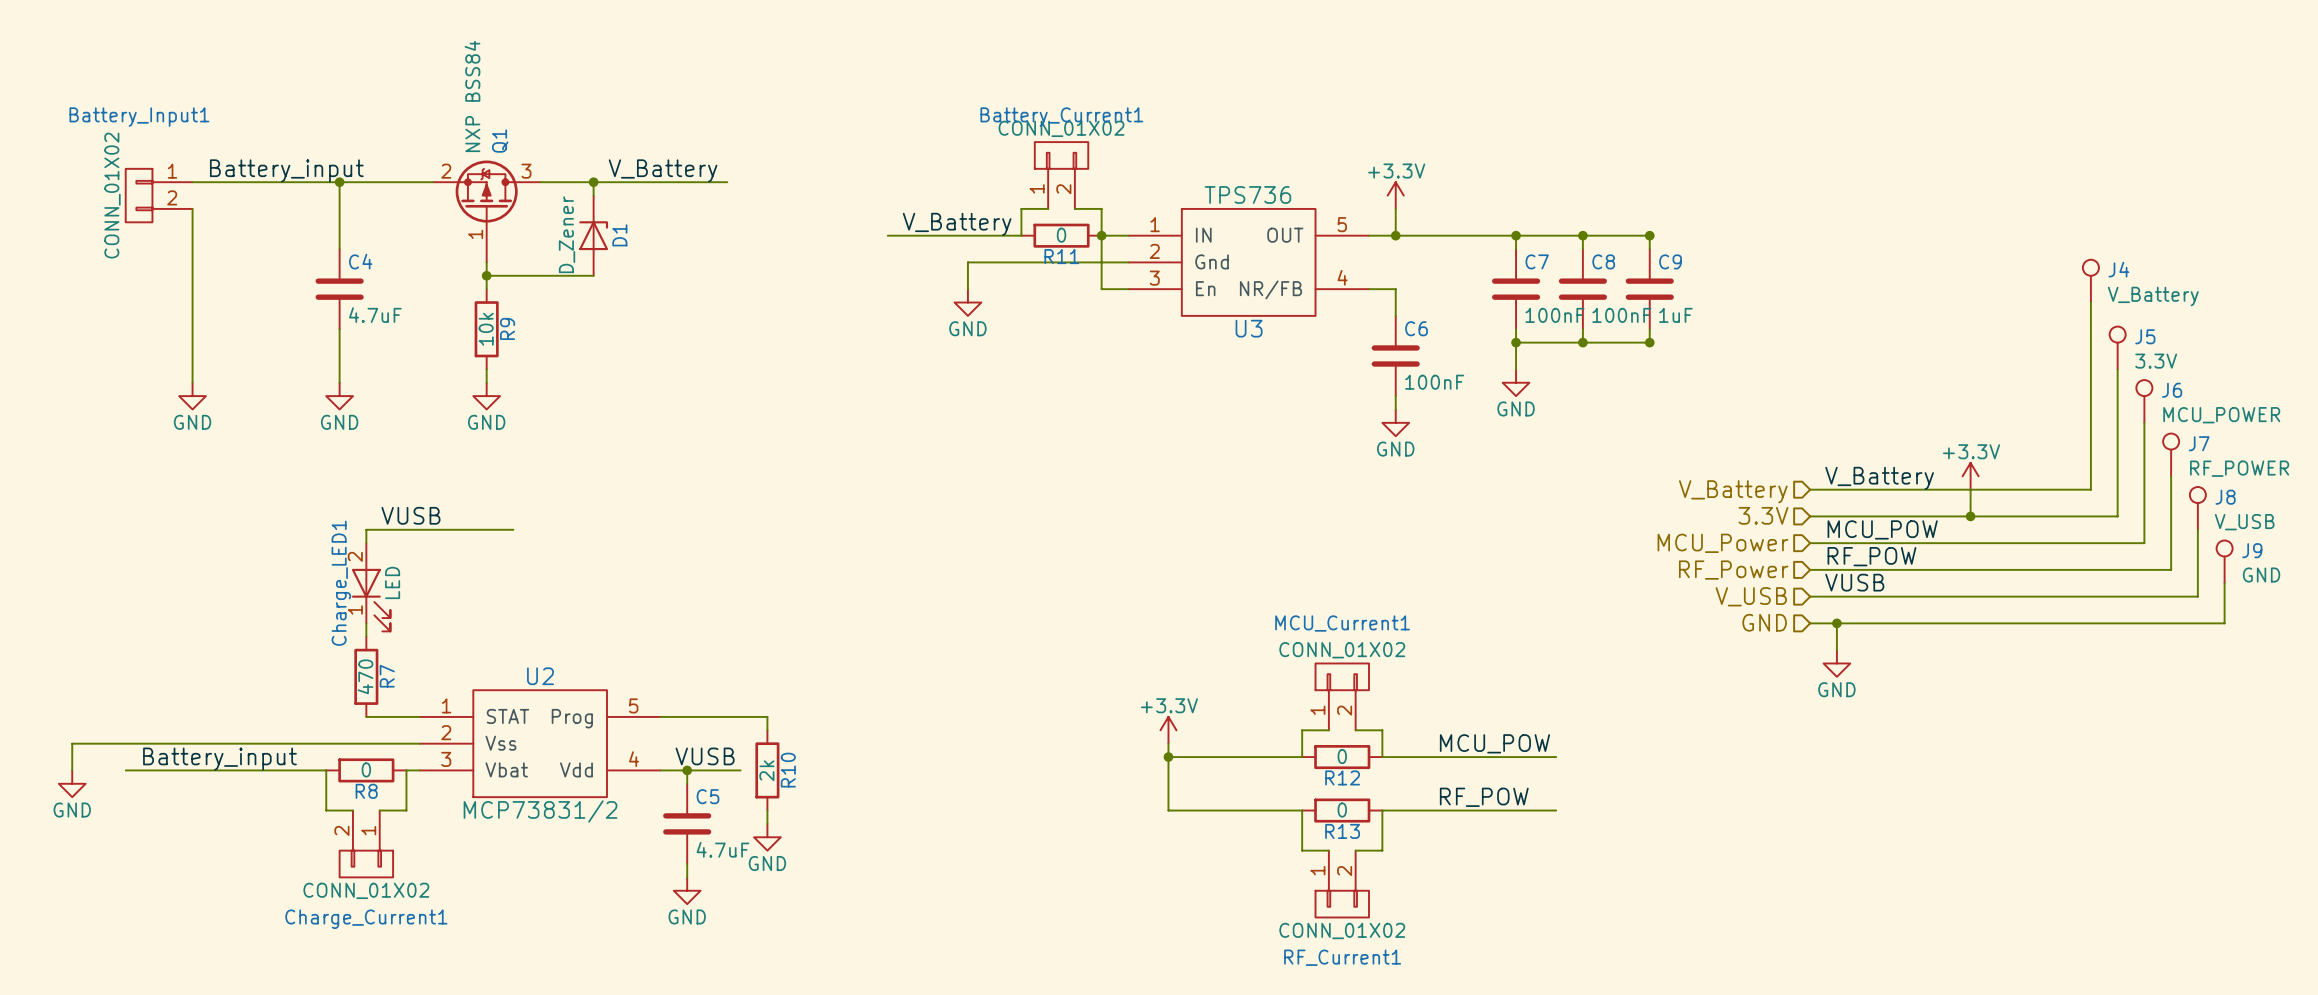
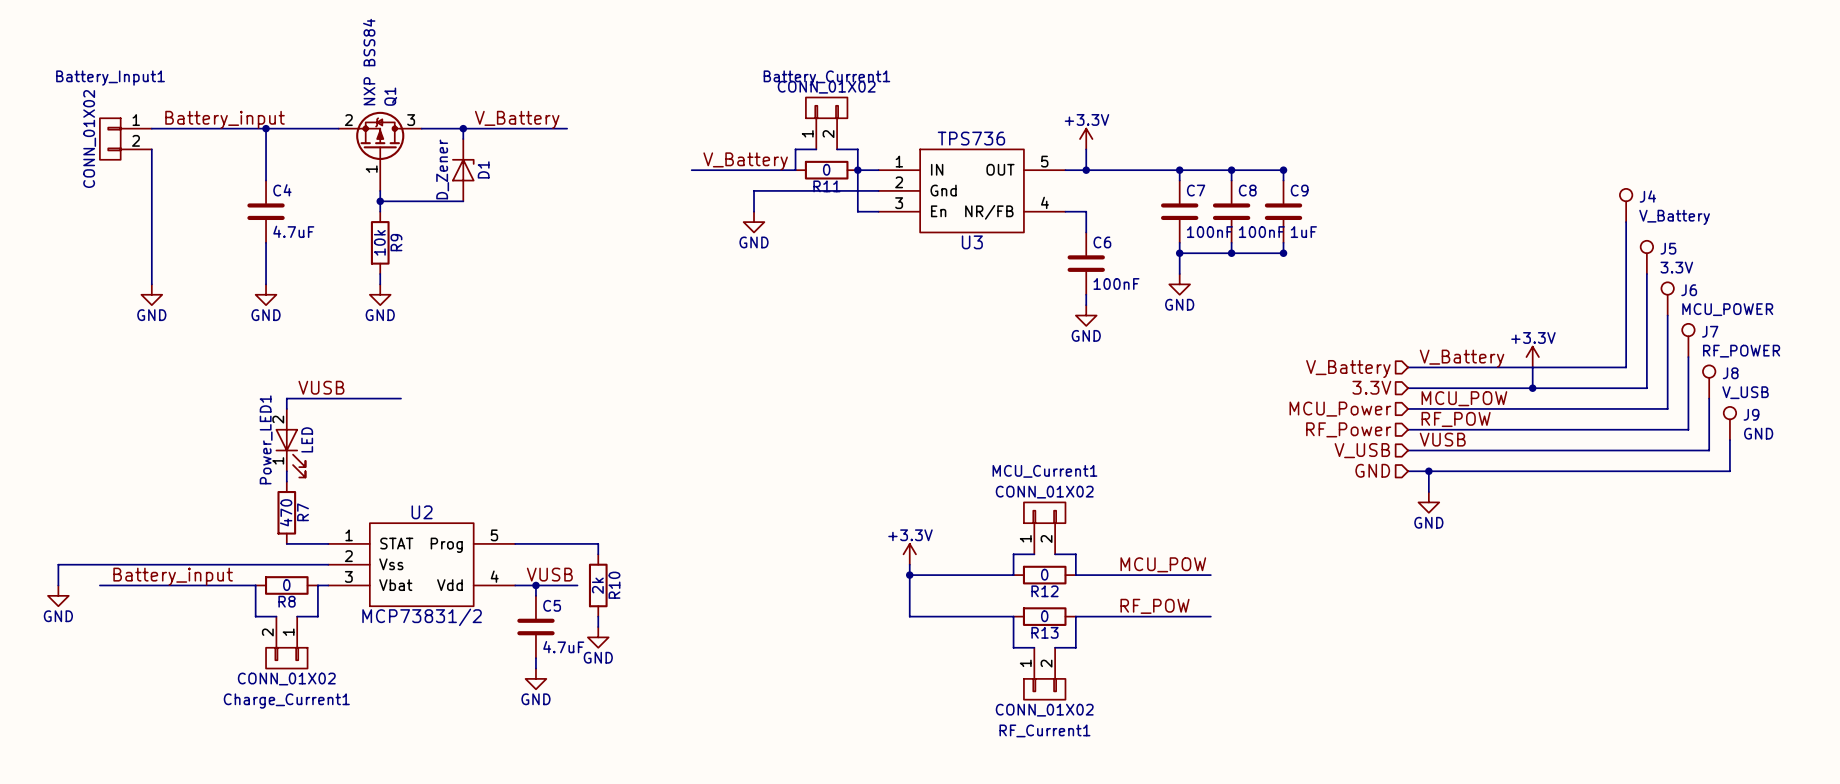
Charge_LED1 name: Charge_LED1 (341, 583) -> Power_LED1 (266, 439)

